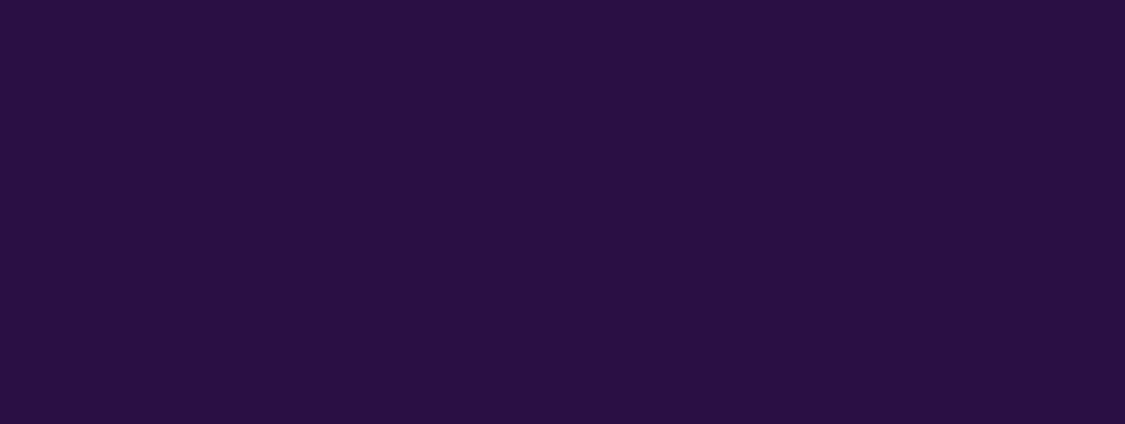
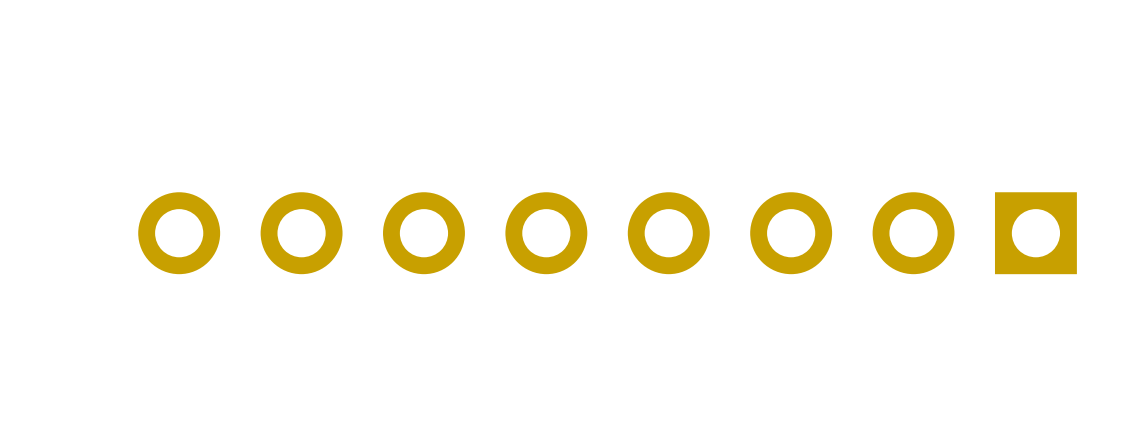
part: none -> (607, 233)

